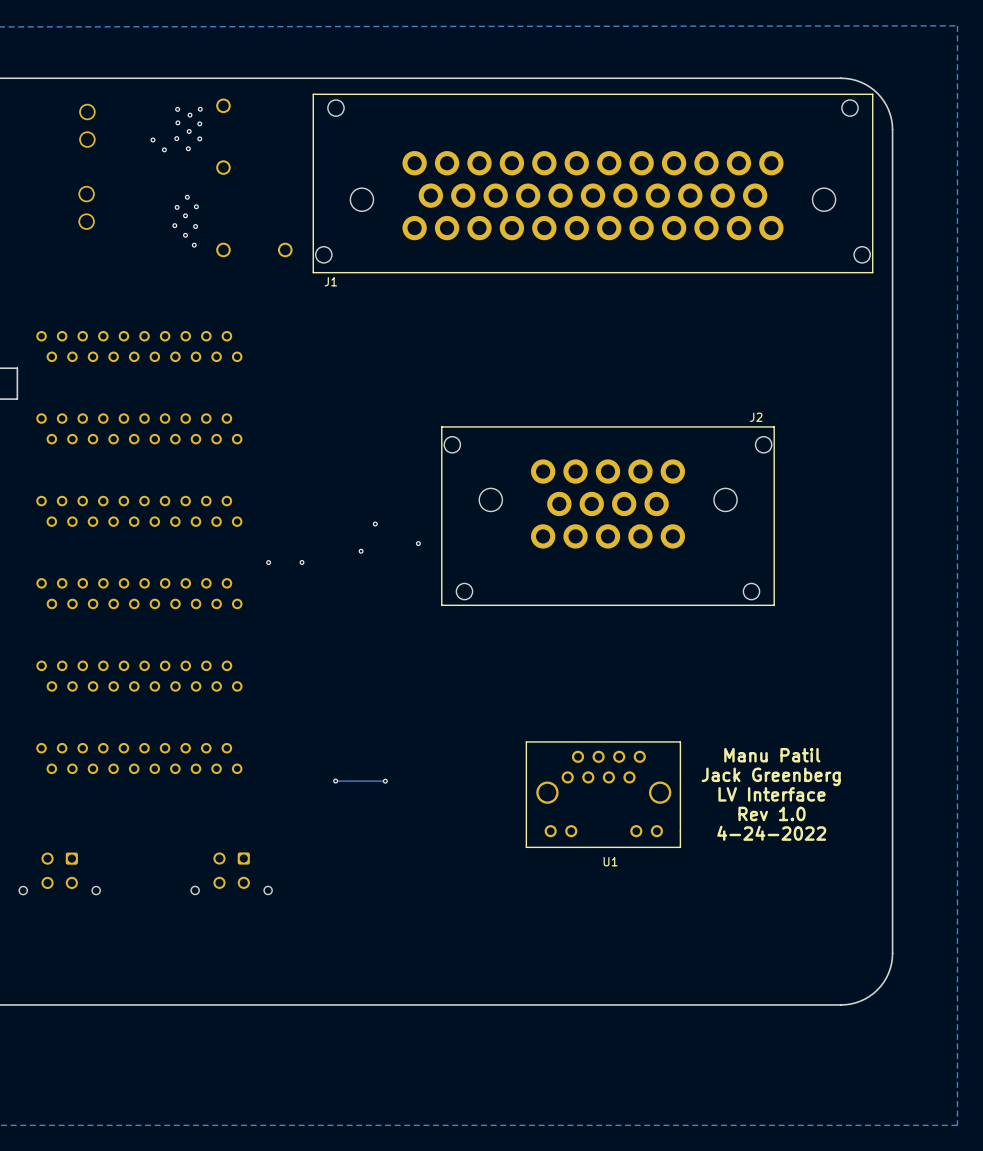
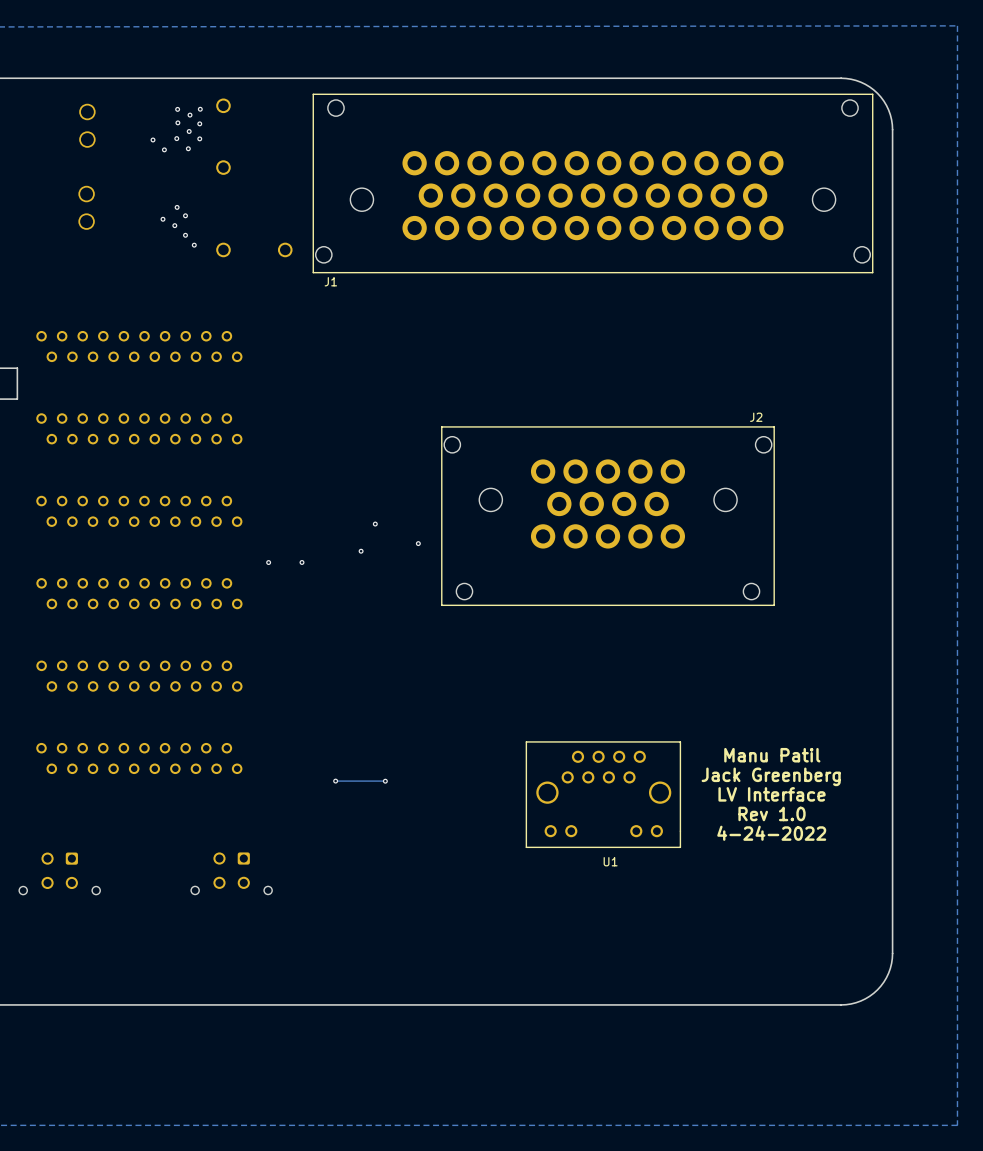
via: (187, 197) -> none
via: (196, 206) -> none
via: none -> (162, 219)
via: (195, 226) -> none

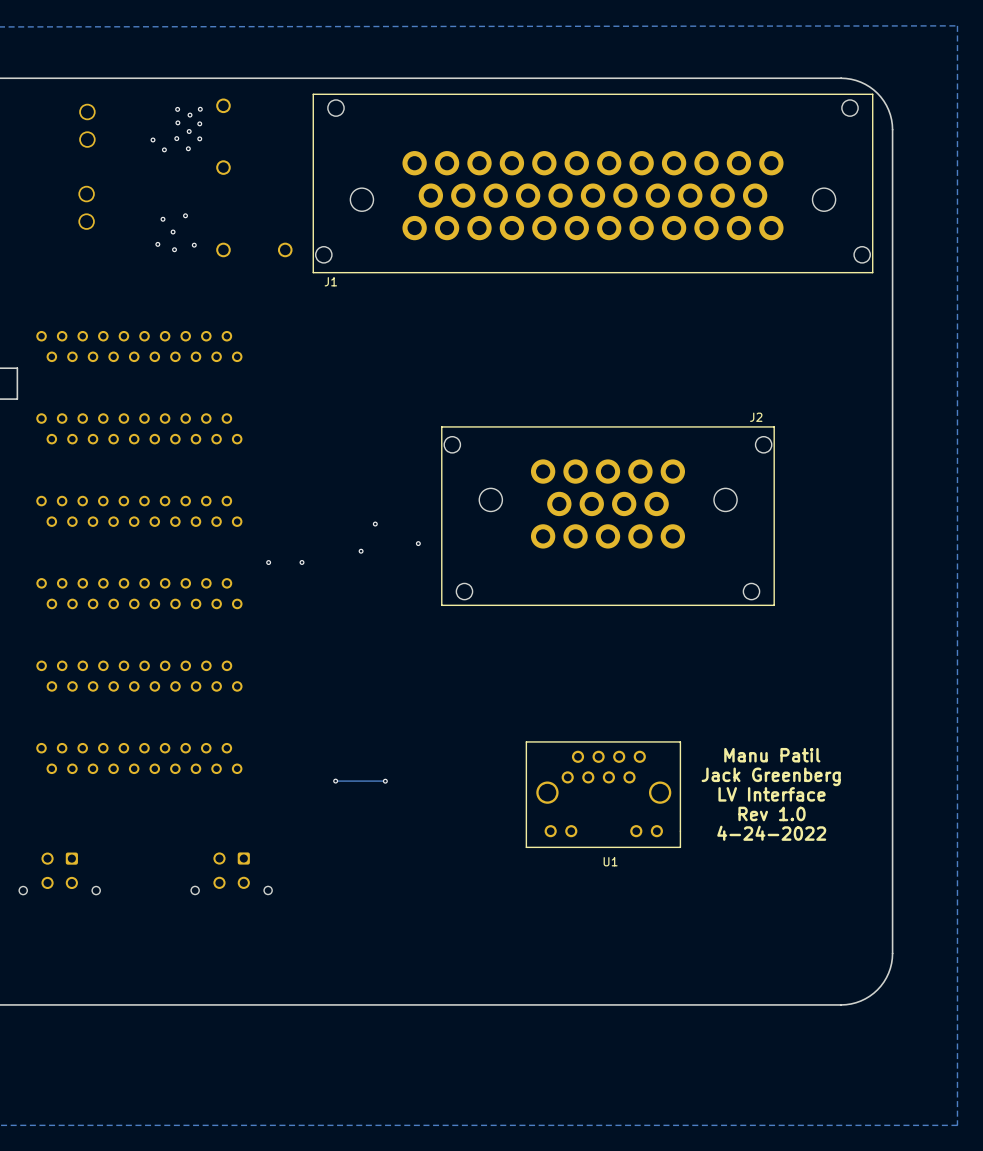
via: (177, 207) -> none
via: (174, 225) -> none
via: none -> (173, 232)
via: (185, 235) -> none
via: none -> (157, 244)
via: none -> (174, 249)

